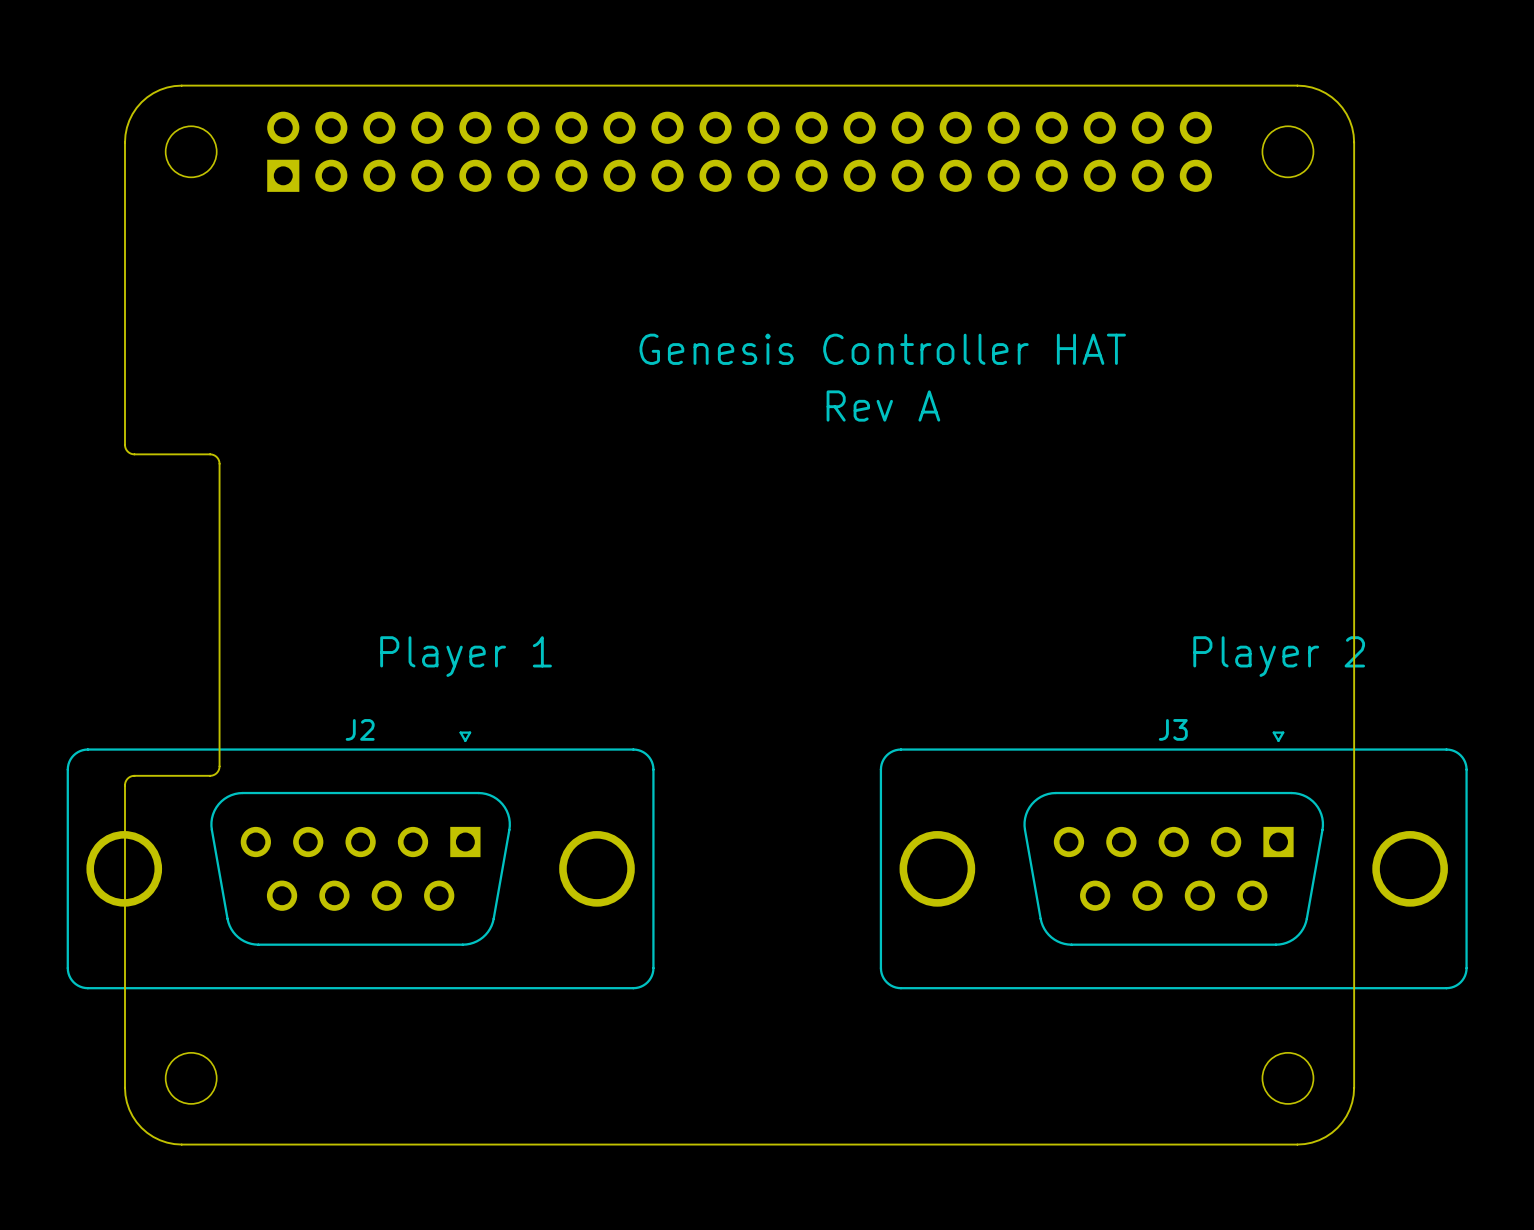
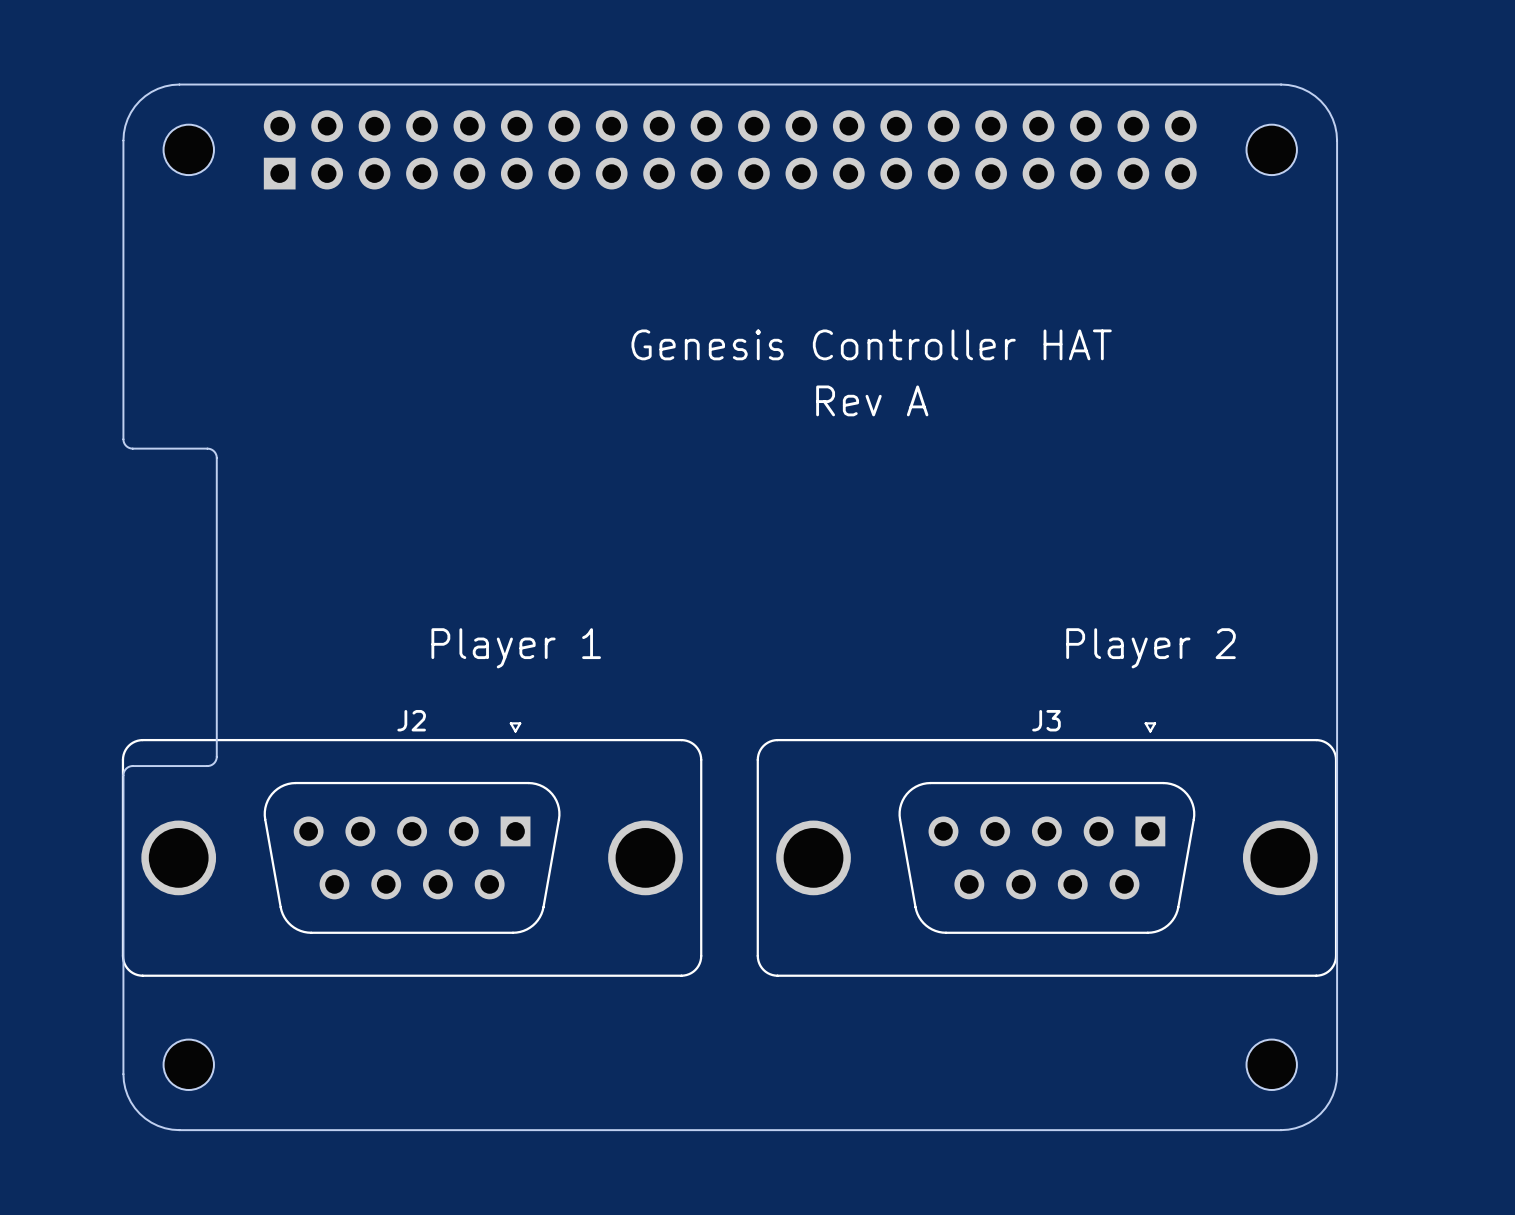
text position: Player 1 (466, 656) -> Player 1 (516, 648)
text position: Player 2 (1279, 656) -> Player 2 (1151, 648)
J2 position: (360, 860) -> (412, 849)
J3 position: (1173, 860) -> (1046, 849)

